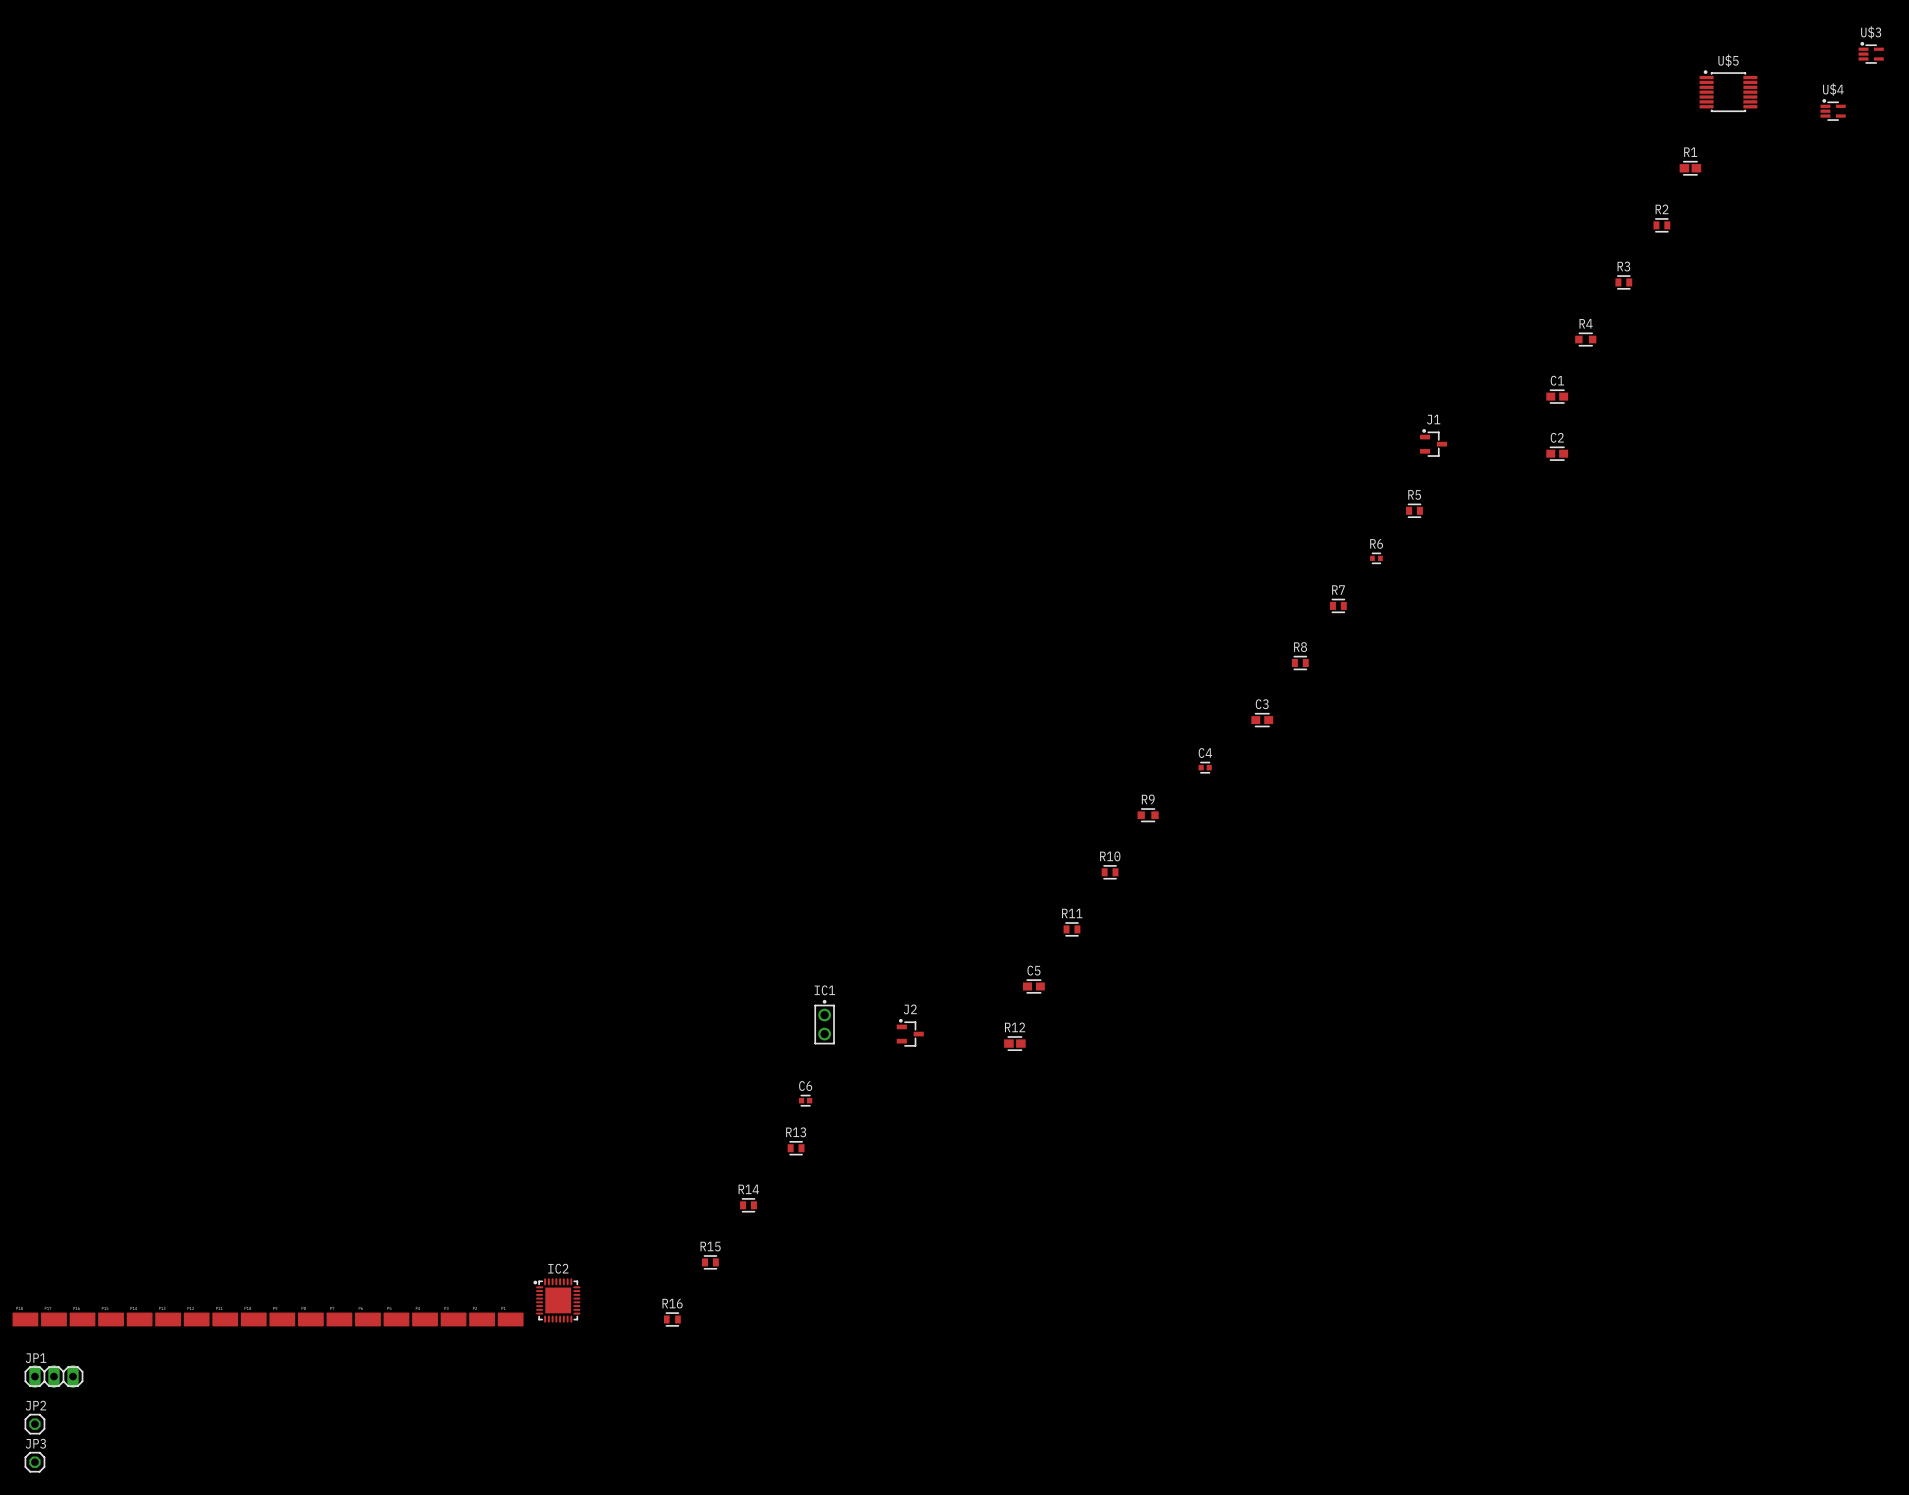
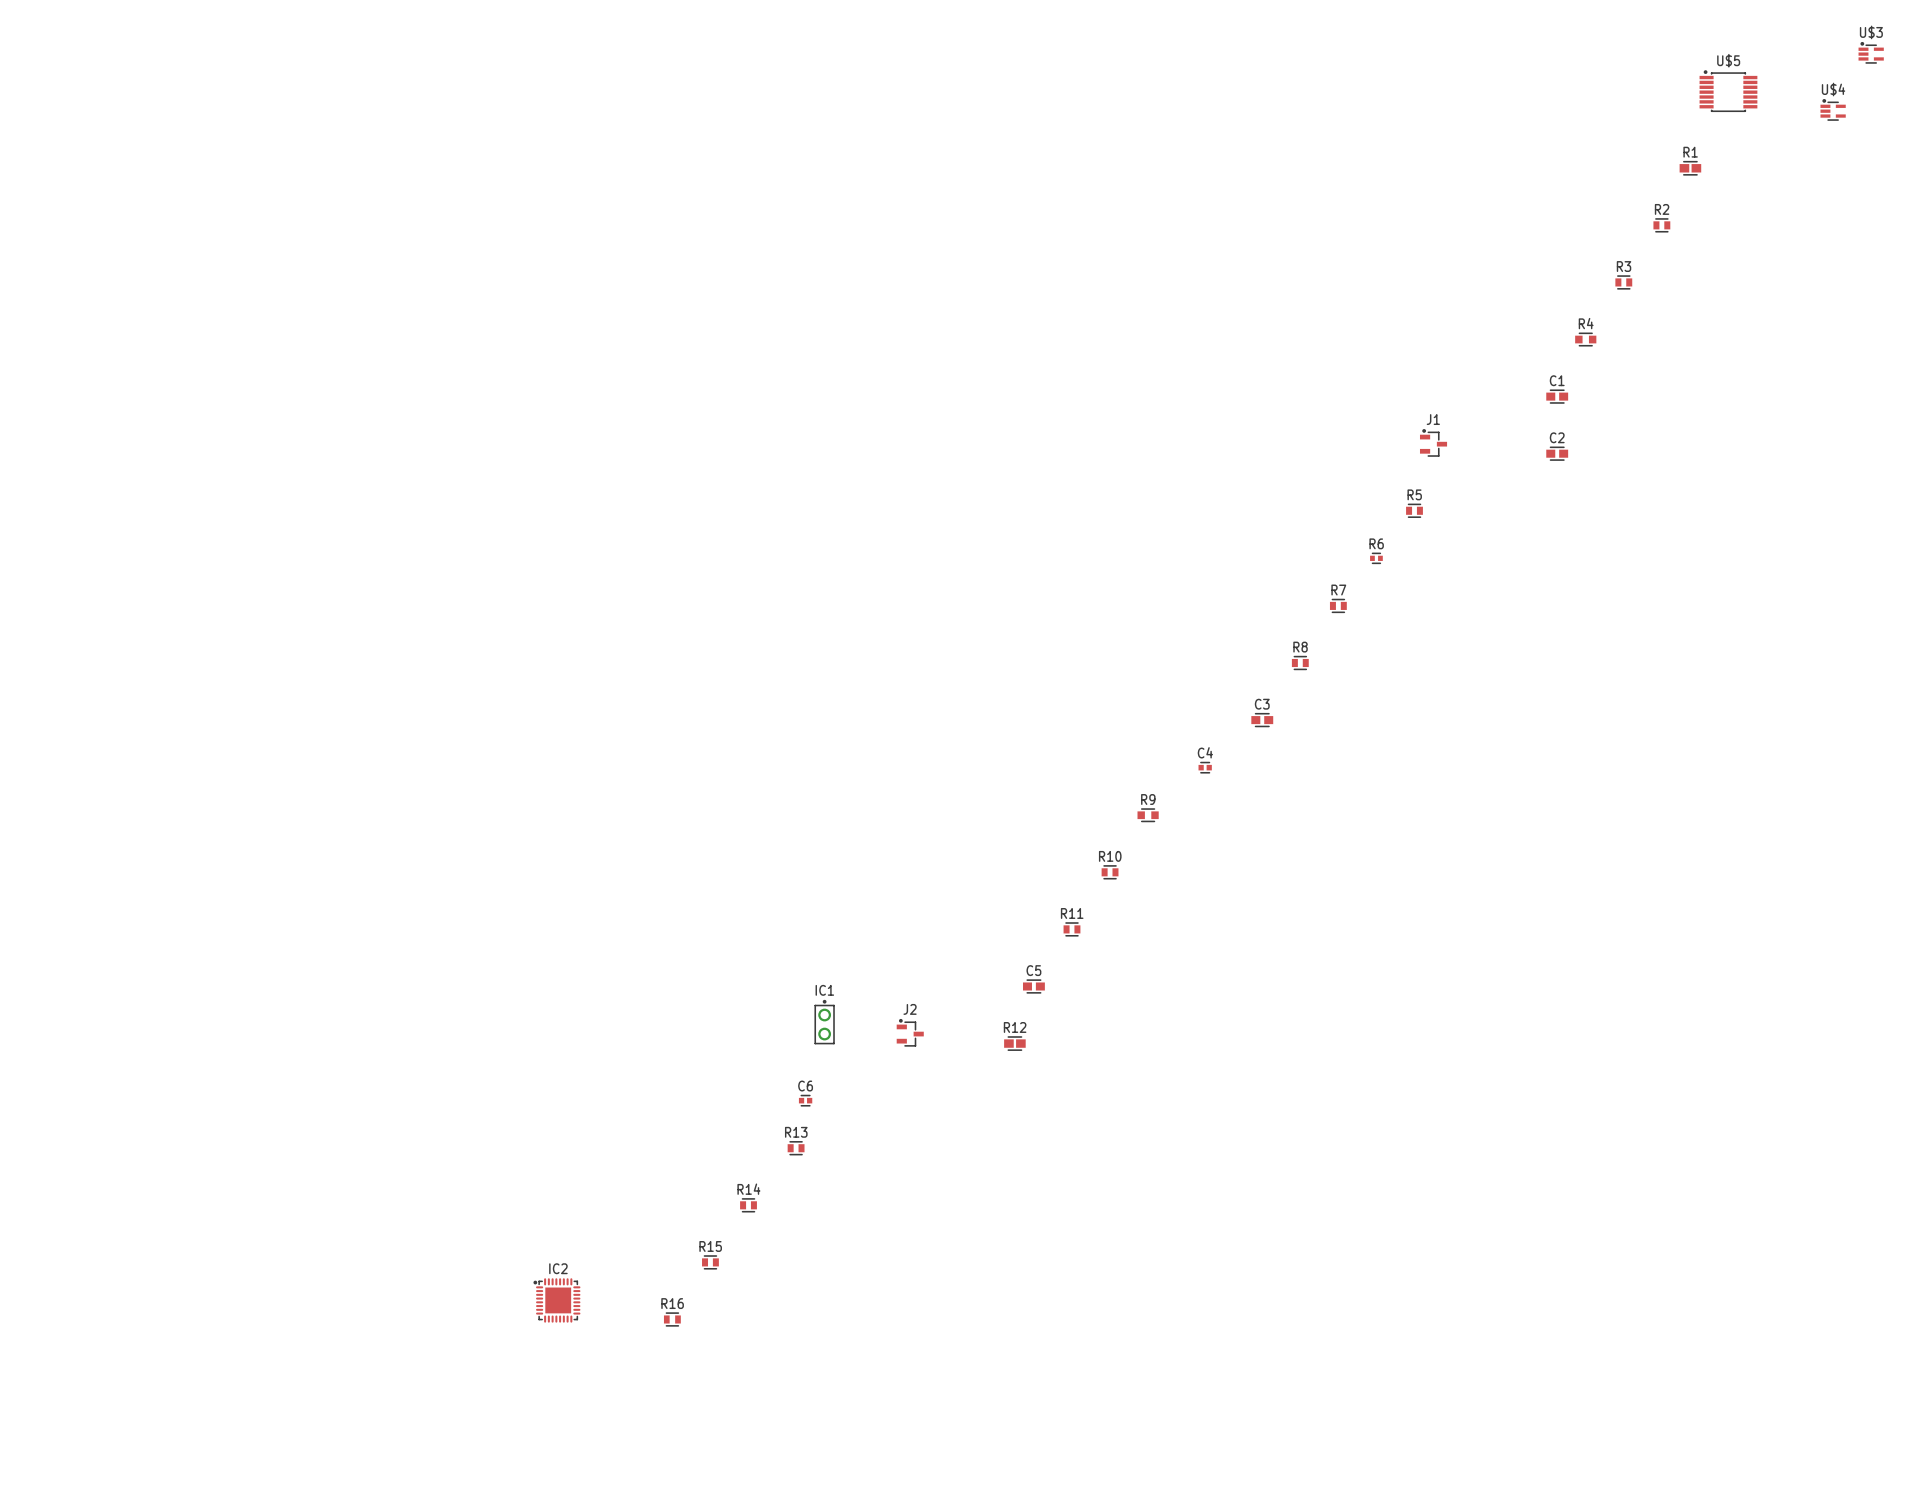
part: (25, 1319) -> none
part: (53, 1319) -> none
part: (82, 1319) -> none
part: (111, 1319) -> none
part: (139, 1319) -> none
part: (168, 1319) -> none
part: (196, 1319) -> none
part: (225, 1319) -> none
part: (253, 1319) -> none
part: (282, 1319) -> none
part: (310, 1319) -> none
part: (339, 1319) -> none
part: (367, 1319) -> none
part: (396, 1319) -> none
part: (425, 1319) -> none
part: (453, 1319) -> none
part: (482, 1319) -> none
part: (510, 1319) -> none
JP1: (53, 1376) -> none
JP2: (34, 1424) -> none
JP3: (34, 1462) -> none

